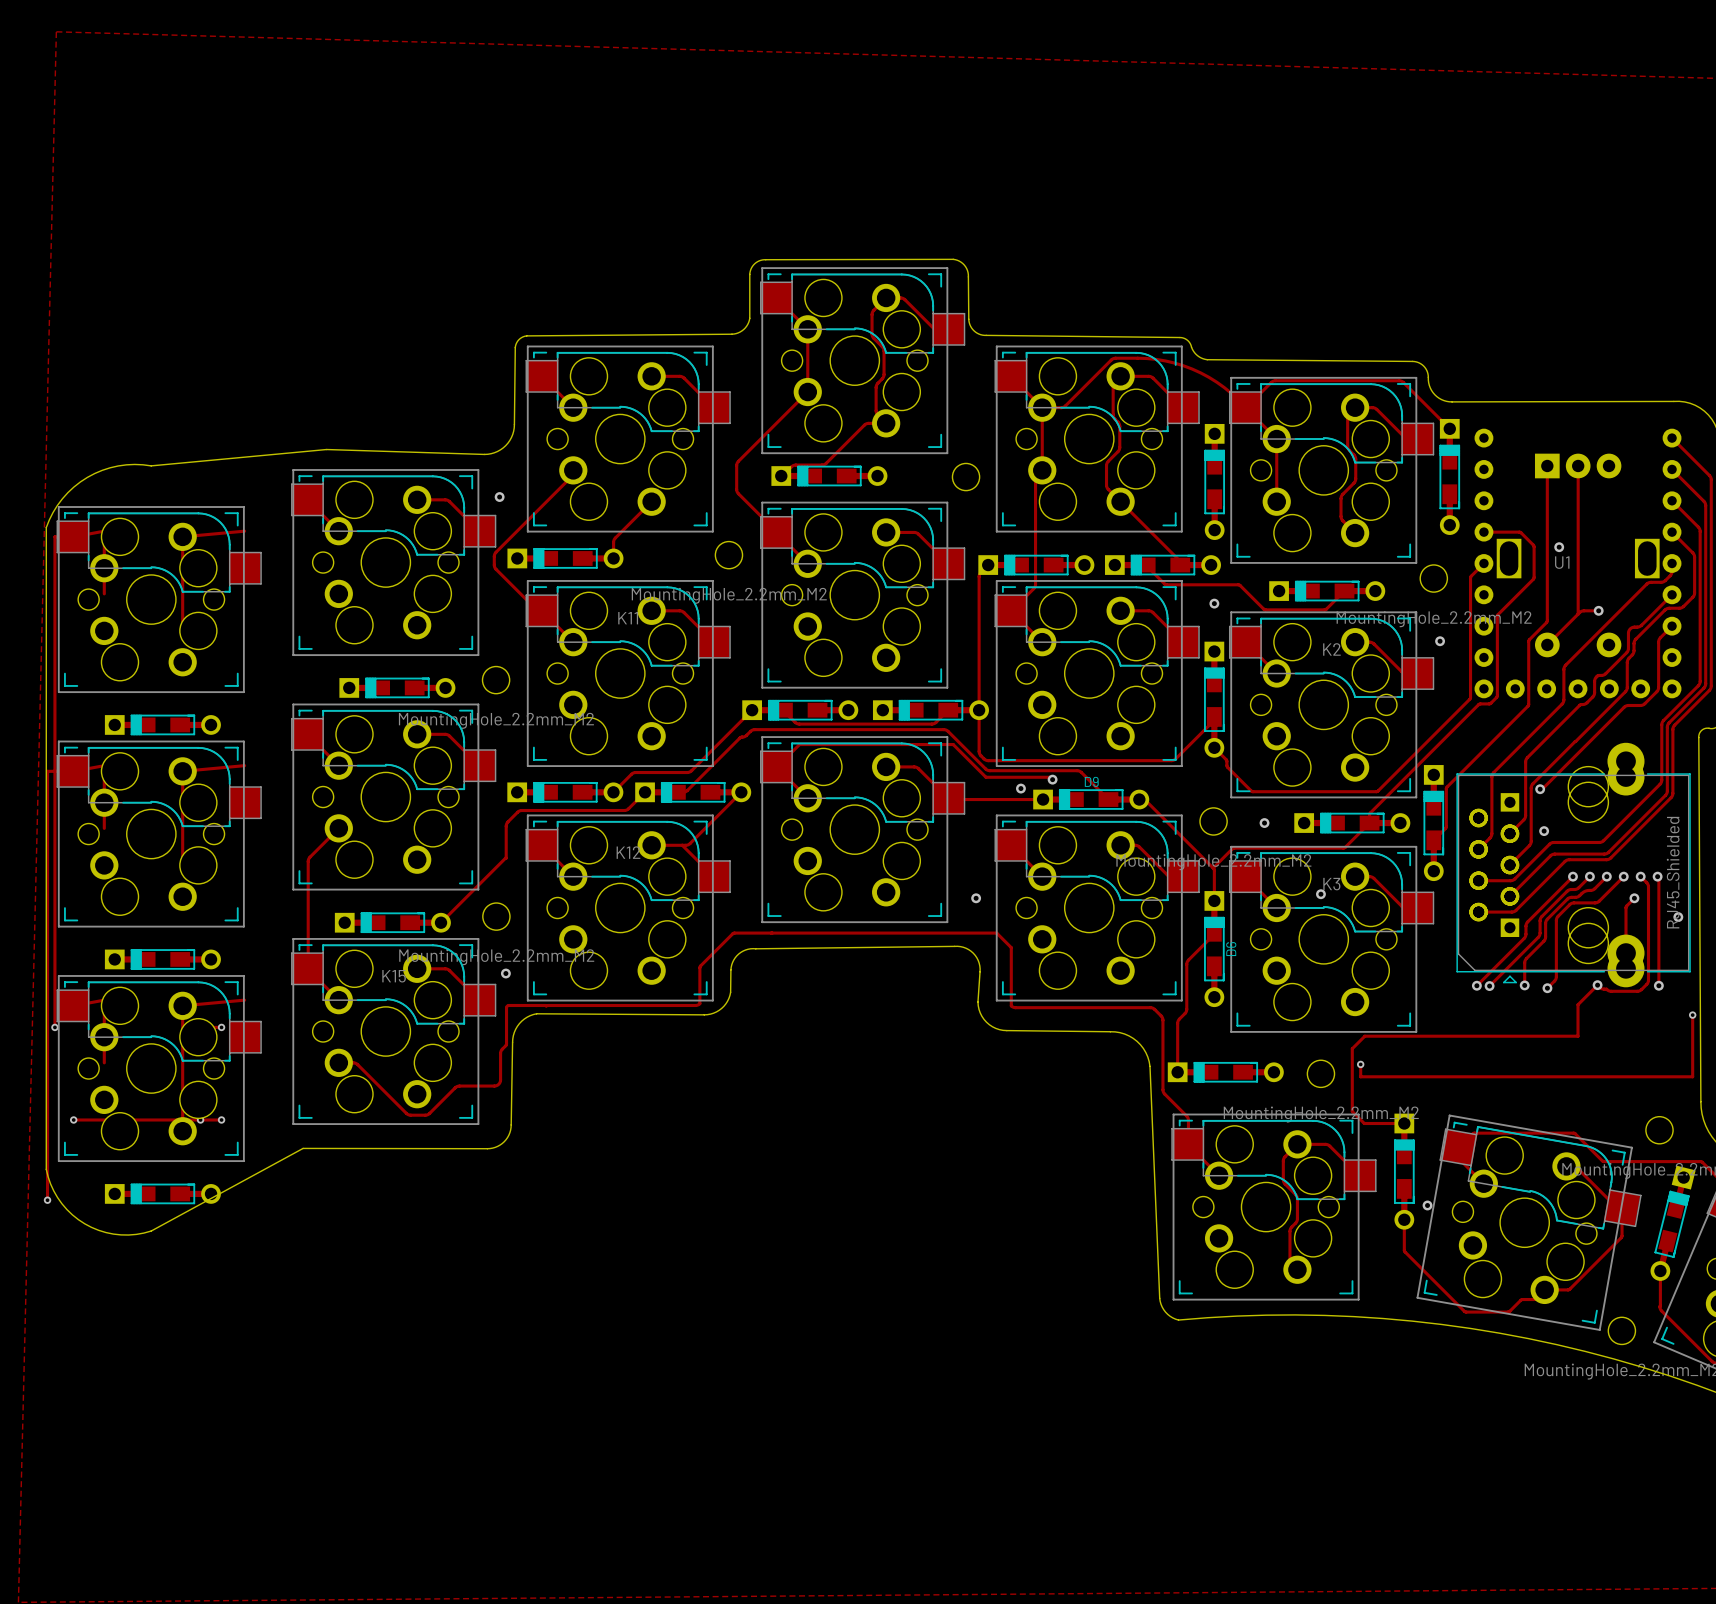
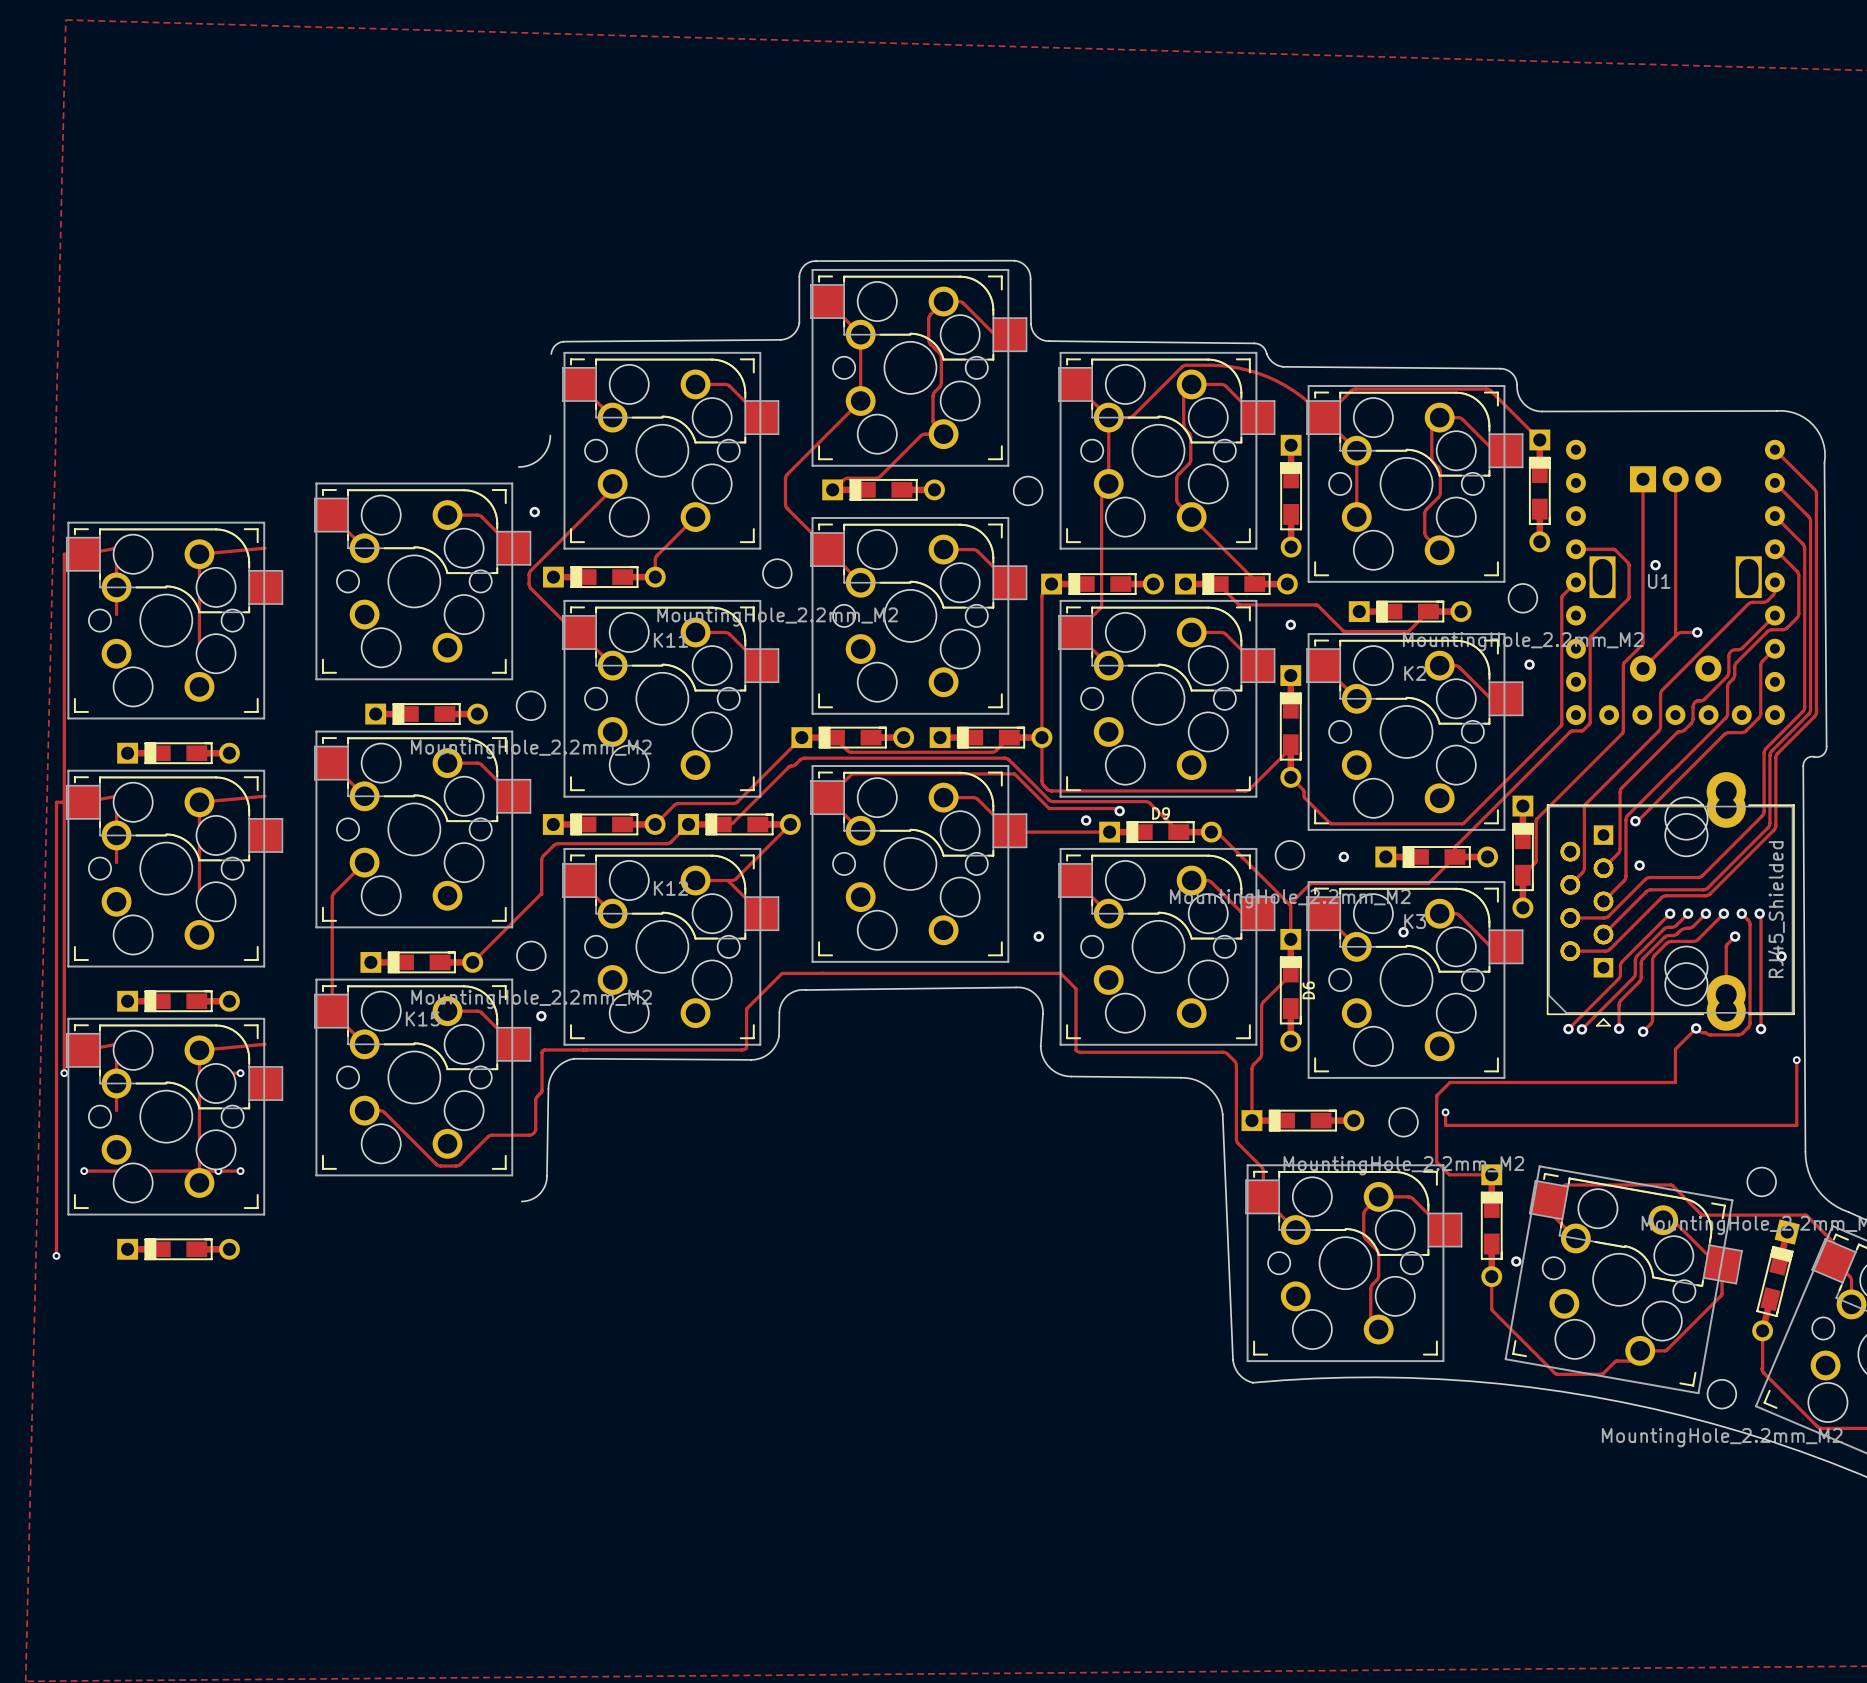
board edge: (515, 347) (514, 424) -> none
board edge: (484, 454) (326, 449) (151, 465) (126, 464) (102, 470) (87, 477) (67, 492) (53, 512) (46, 527) (46, 1169) (53, 1190) (72, 1214) (98, 1230) (128, 1235) (151, 1231) (303, 1148) (487, 1148) -> none

